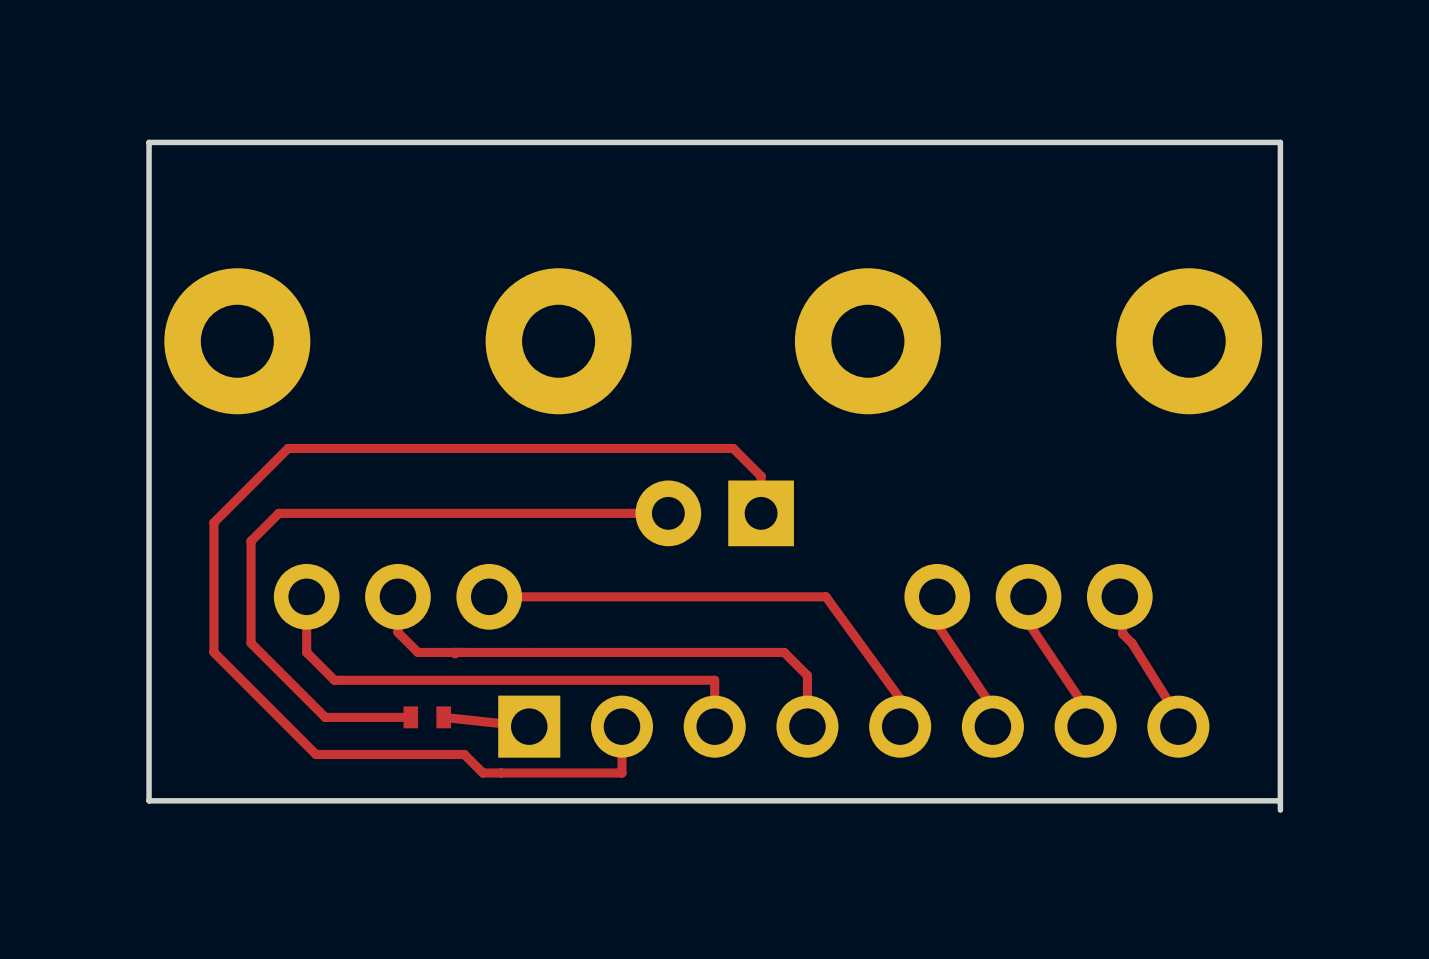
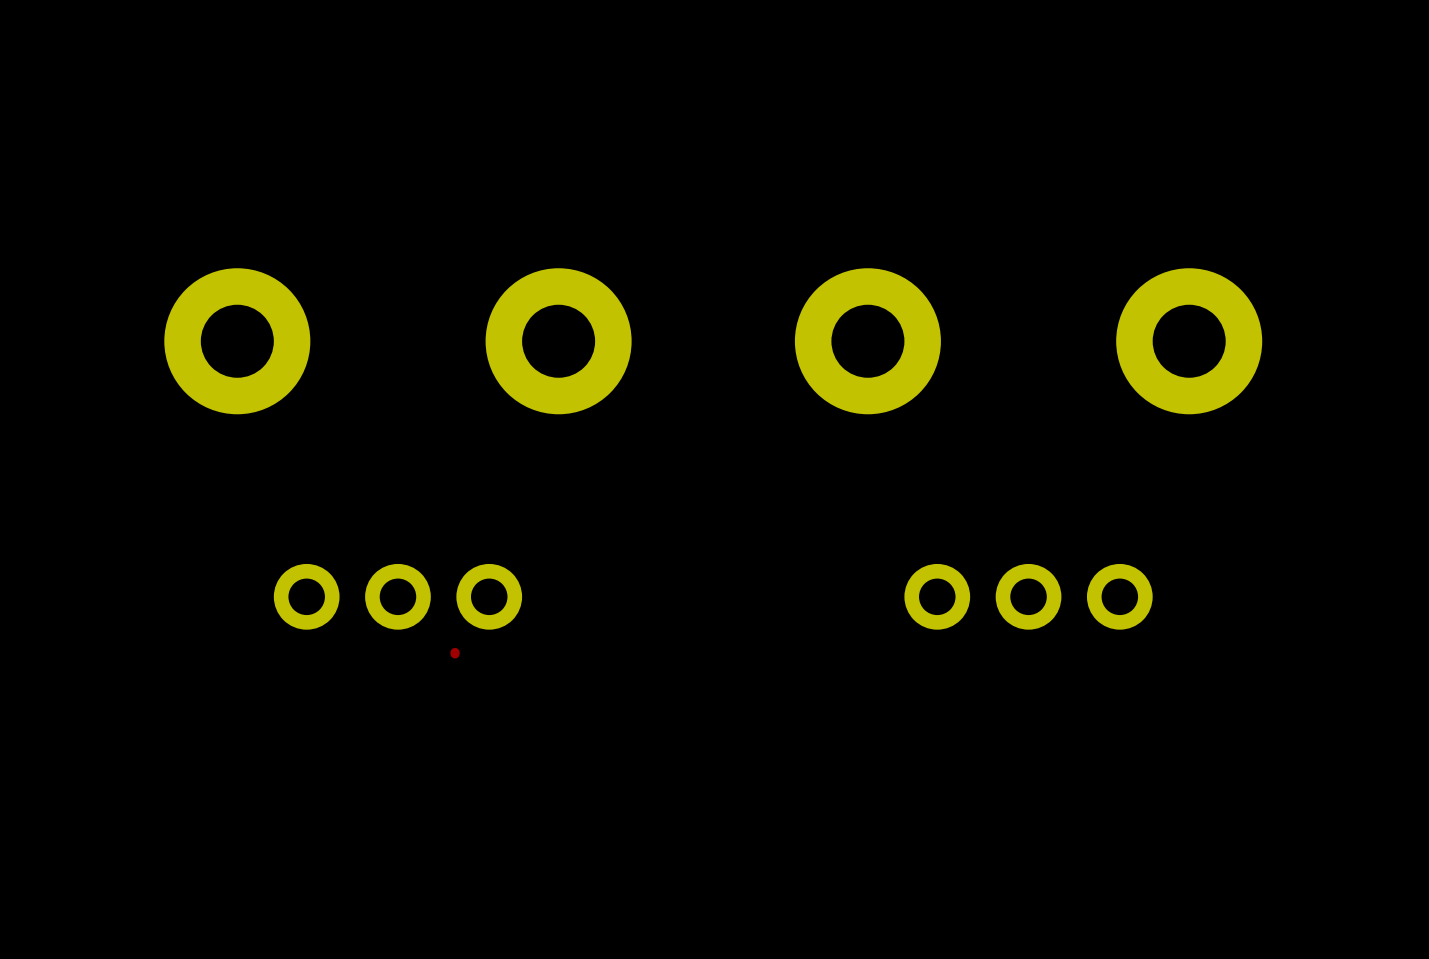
top track: (668, 513) (278, 513) (251, 541) (251, 643) (325, 717) (410, 717) -> none
part: (714, 513) -> none
top track: (761, 513) (761, 476) (733, 448) (288, 448) (213, 522) (213, 652) (315, 754) (464, 754) (482, 773) (621, 773) (621, 726) -> none
top track: (306, 596) (306, 652) (334, 680) (714, 680) (714, 726) -> none
top track: (397, 596) (397, 632) (417, 652) (784, 652) (807, 675) (807, 726) -> none
top track: (489, 596) (825, 596) (900, 698) (900, 726) -> none
top track: (937, 596) (937, 624) (992, 708) (992, 726) -> none
top track: (1028, 596) (1028, 623) (1085, 708) (1085, 726) -> none
top track: (1119, 596) (1122, 599) (1122, 633) (1132, 643) (1178, 717) (1178, 726) -> none
part: (427, 717) -> none
top track: (443, 717) (529, 726) -> none
part: (853, 726) -> none
board edge: (1280, 800) (149, 800) (149, 142) (1280, 142) (1280, 810) -> none

